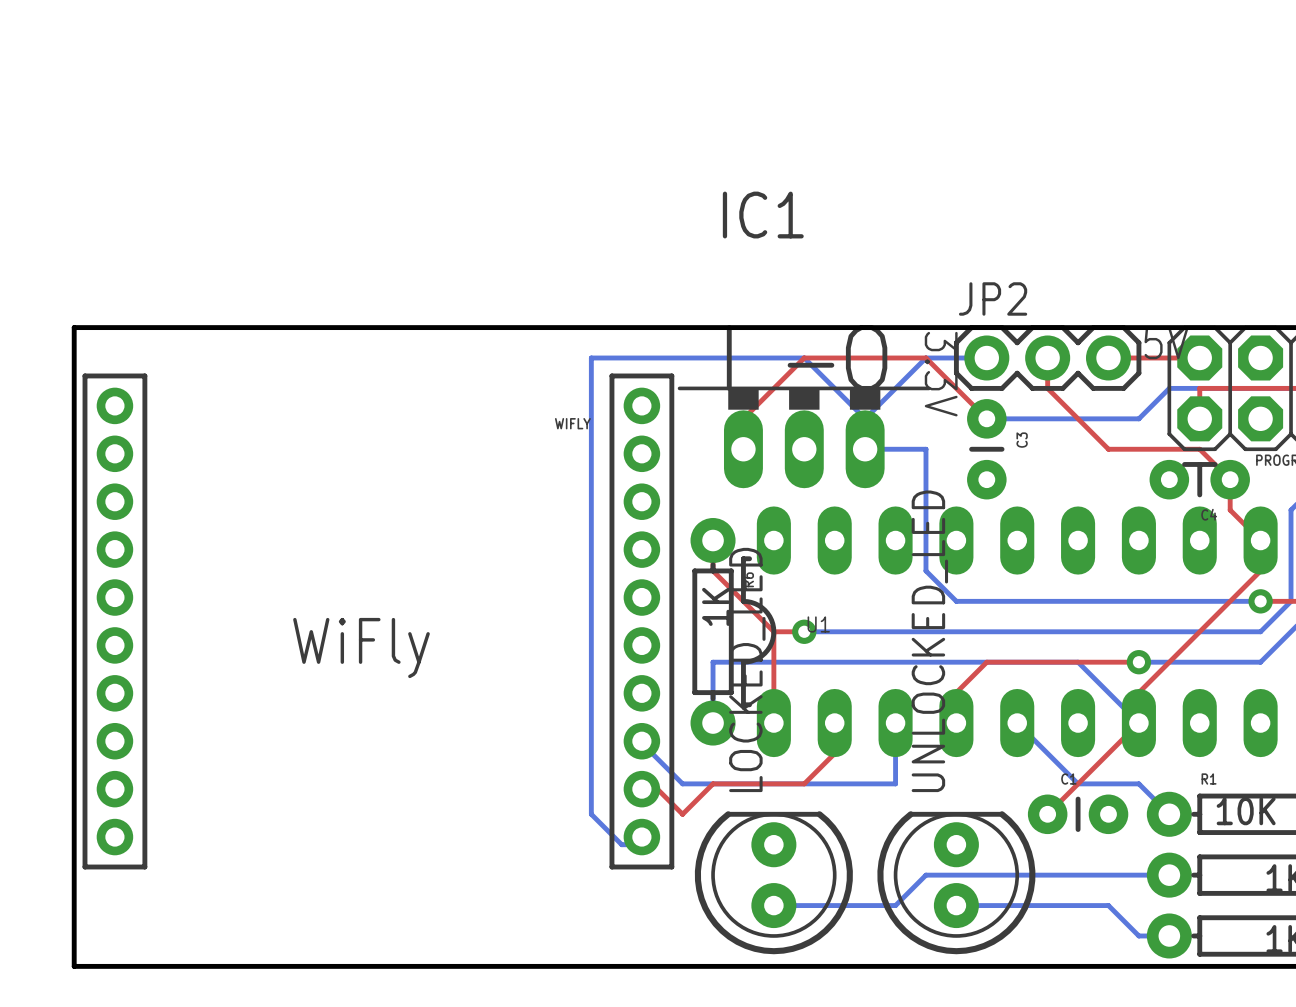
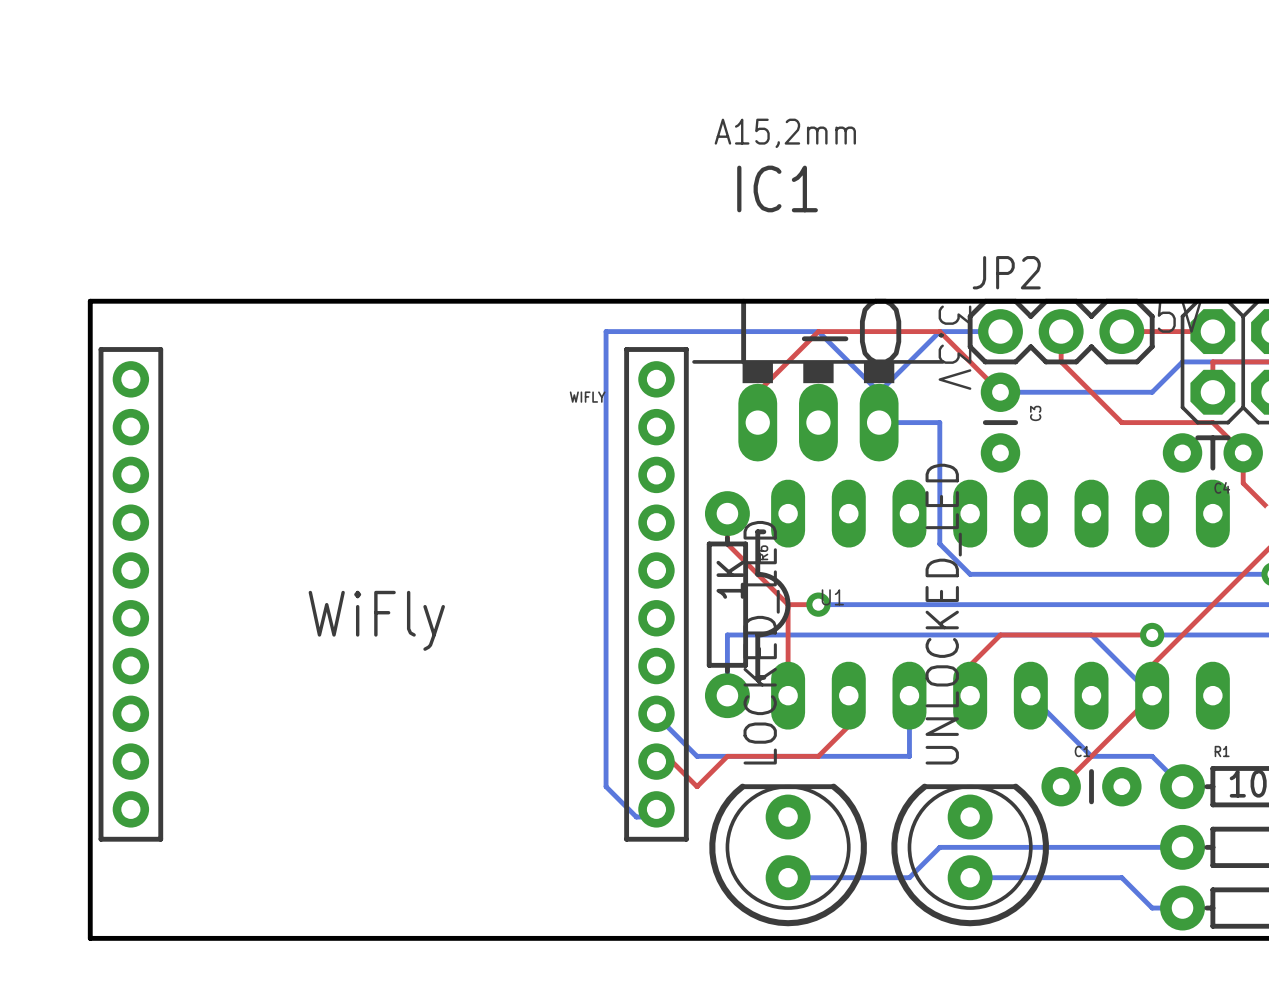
IC1 text: none -> A15,2mm (785, 133)

